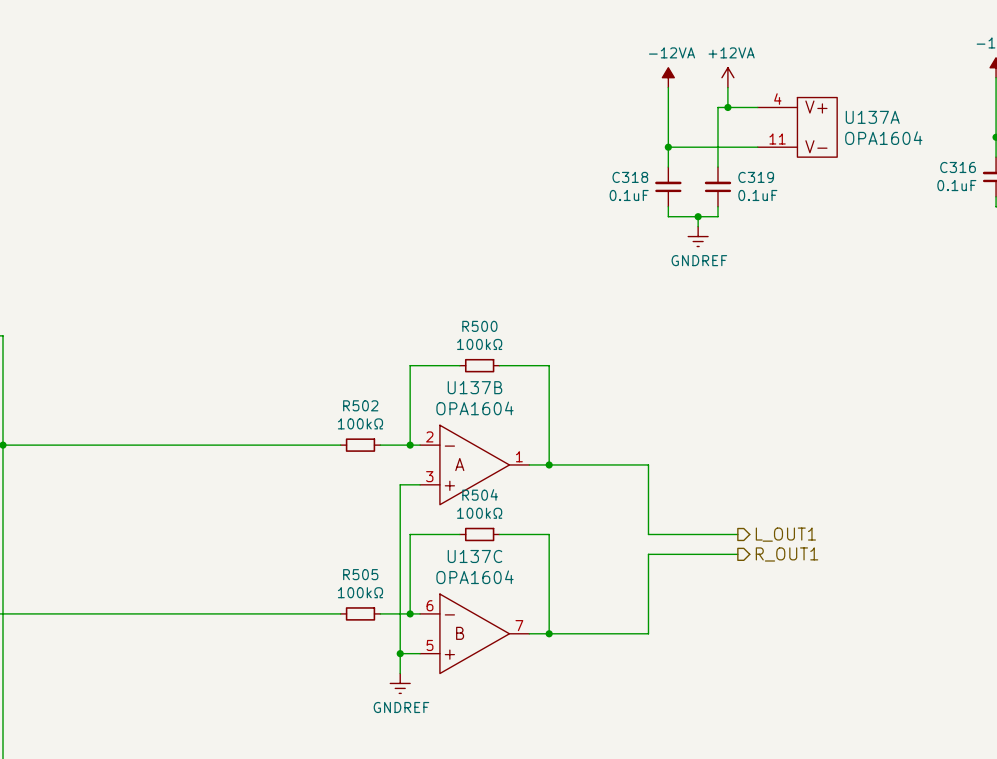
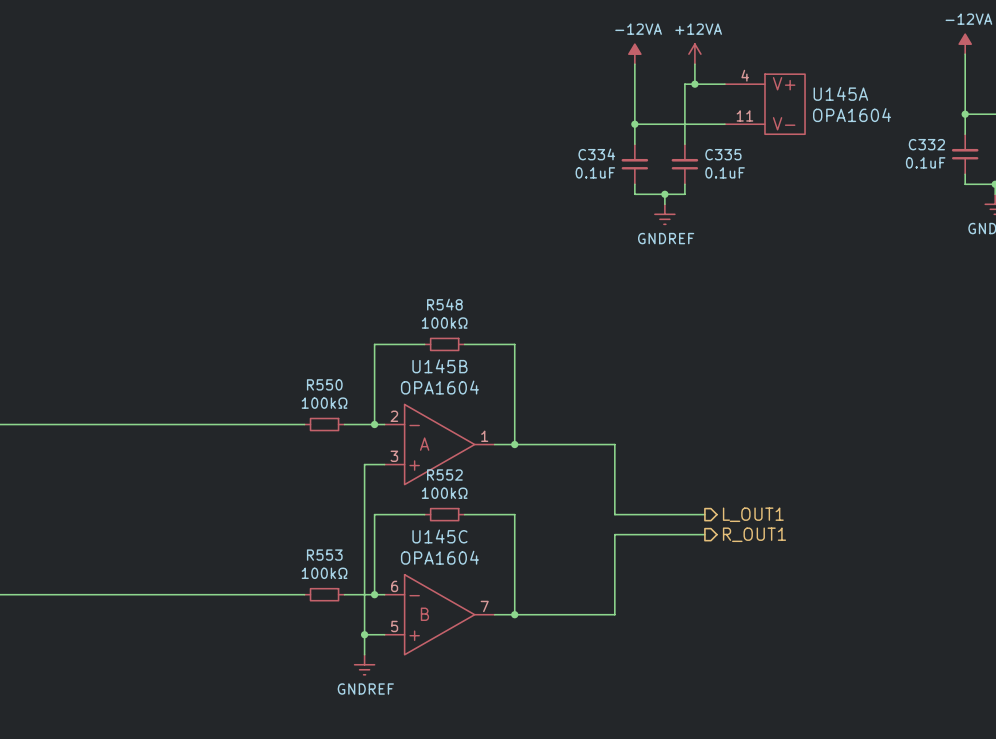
U137A name: U137A (872, 117) -> U145A (840, 93)
C316 name: C316 (958, 167) -> C332 (926, 144)
C318 name: C318 (630, 177) -> C334 (596, 154)
C319 name: C319 (756, 177) -> C335 (723, 154)
R500 name: R500 (479, 326) -> R548 (444, 304)
U137B name: U137B (474, 387) -> U145B (439, 366)
R502 name: R502 (360, 405) -> R550 (324, 384)
R504 name: R504 (480, 494) -> R552 (444, 475)
U137C name: U137C (474, 556) -> U145C (439, 536)
R505 name: R505 (360, 574) -> R553 (324, 555)

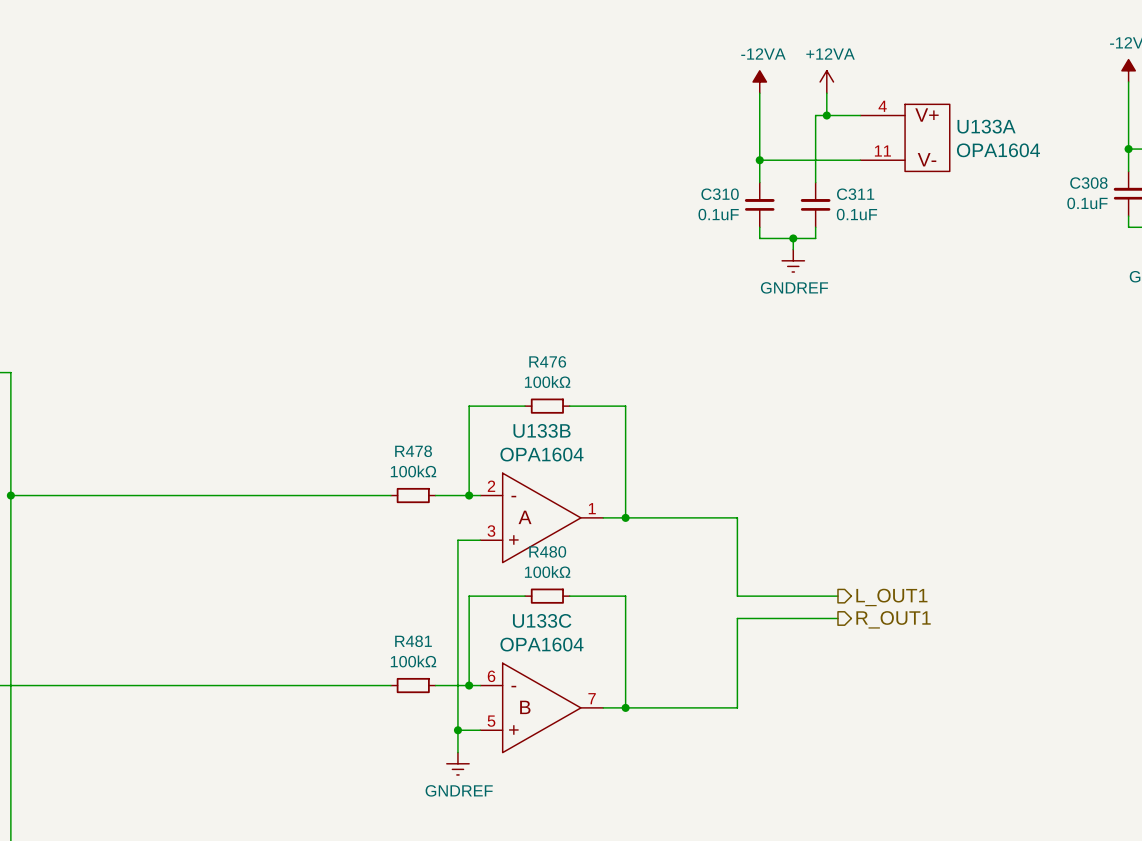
U145A name: U145A (840, 93) -> U133A (986, 126)
C332 name: C332 (926, 144) -> C308 (1088, 183)
C334 name: C334 (596, 154) -> C310 (720, 194)
C335 name: C335 (723, 154) -> C311 (855, 194)
R548 name: R548 (444, 304) -> R476 (547, 361)
U145B name: U145B (439, 366) -> U133B (542, 430)
R550 name: R550 (324, 384) -> R478 (413, 451)
R552 name: R552 (444, 475) -> R480 (547, 551)
U145C name: U145C (439, 536) -> U133C (542, 620)
R553 name: R553 (324, 555) -> R481 (413, 641)

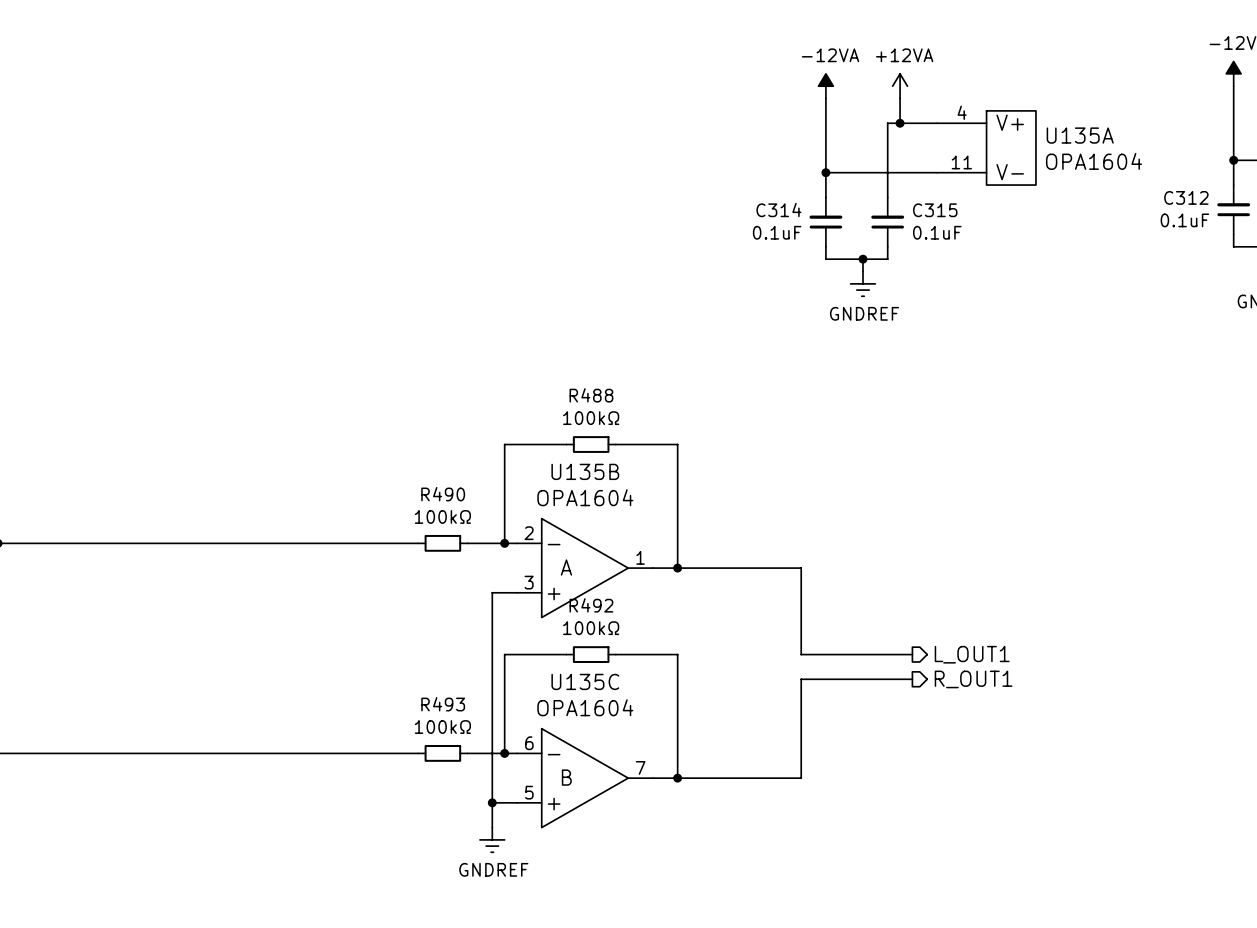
U133A name: U133A (986, 126) -> U135A (1080, 135)
C308 name: C308 (1088, 183) -> C312 (1186, 197)
C310 name: C310 (720, 194) -> C314 (778, 209)
C311 name: C311 (855, 194) -> C315 (935, 210)
R476 name: R476 (547, 361) -> R488 (591, 395)
U133B name: U133B (542, 430) -> U135B (585, 471)
R478 name: R478 (413, 451) -> R490 (443, 494)
R480 name: R480 (547, 551) -> R492 (591, 605)
U133C name: U133C (542, 620) -> U135C (585, 681)
R481 name: R481 (413, 641) -> R493 (443, 704)

